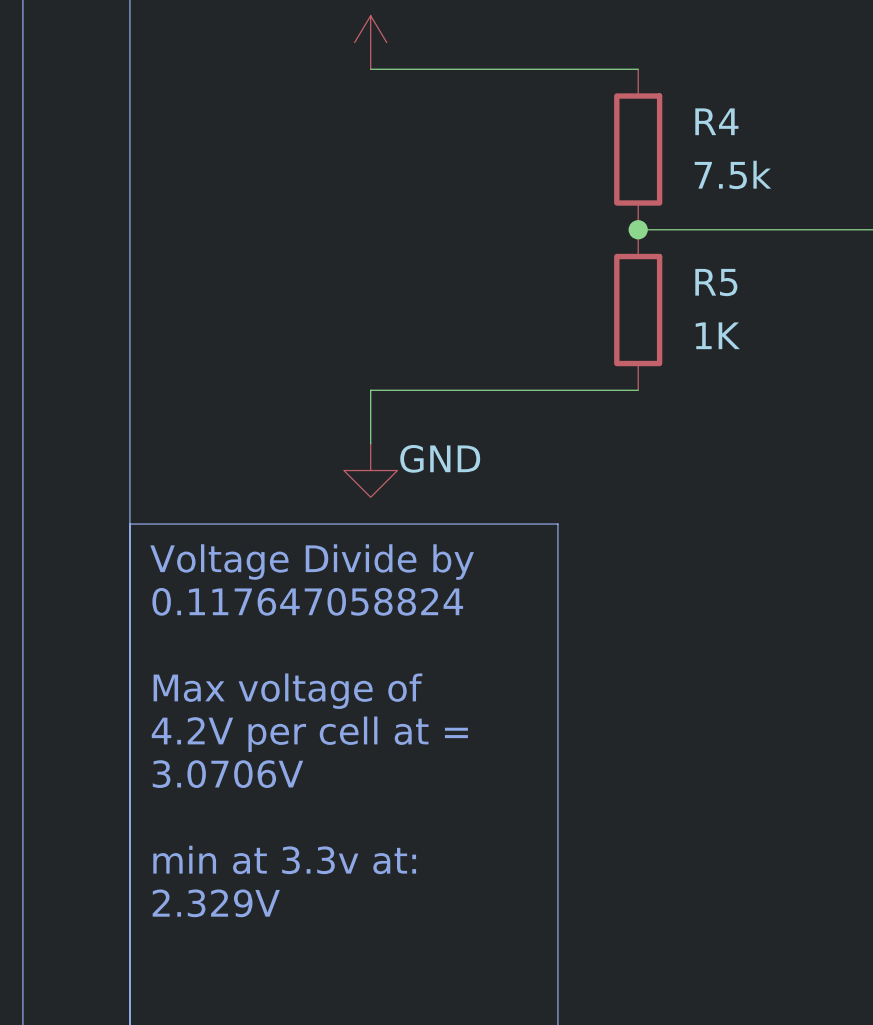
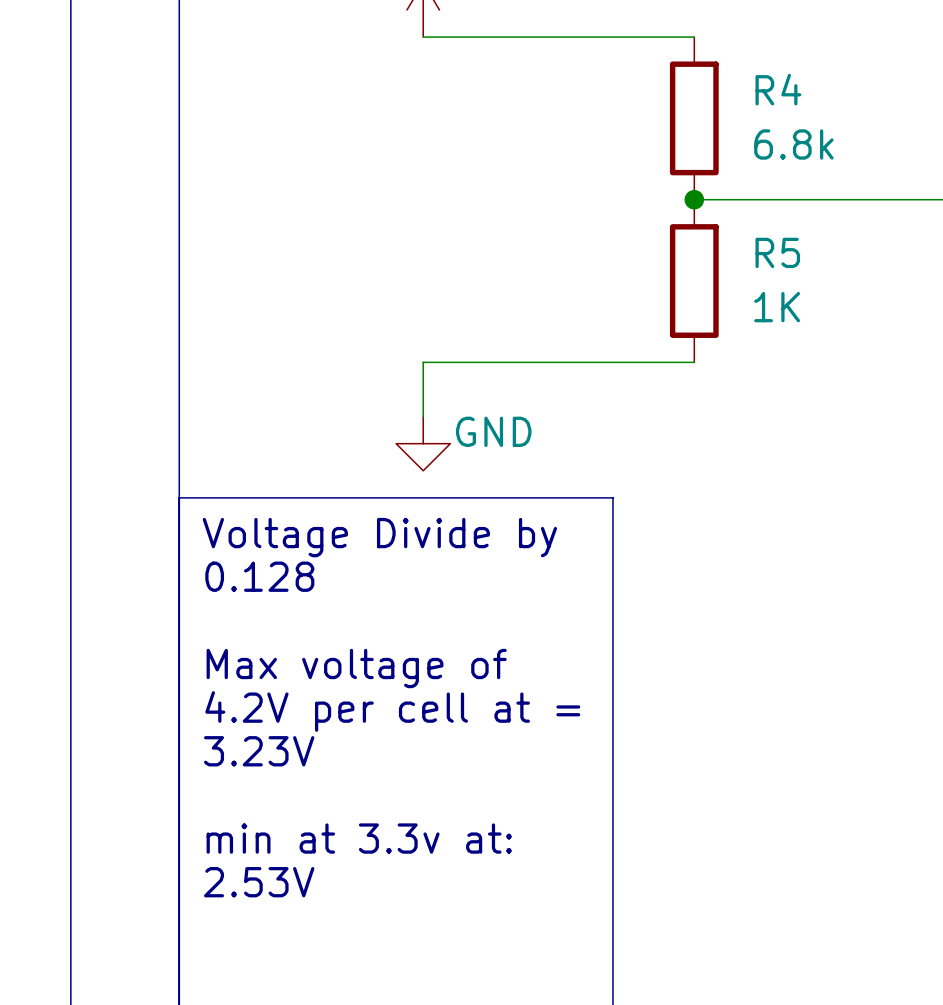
R4 value: 7.5k (732, 174) -> 6.8k (793, 144)
text: 0.117647058824 (307, 601) -> 0.128 (259, 576)
text: 3.0706V (227, 774) -> 3.23V (259, 751)
text: 2.329V (216, 903) -> 2.53V (259, 882)

